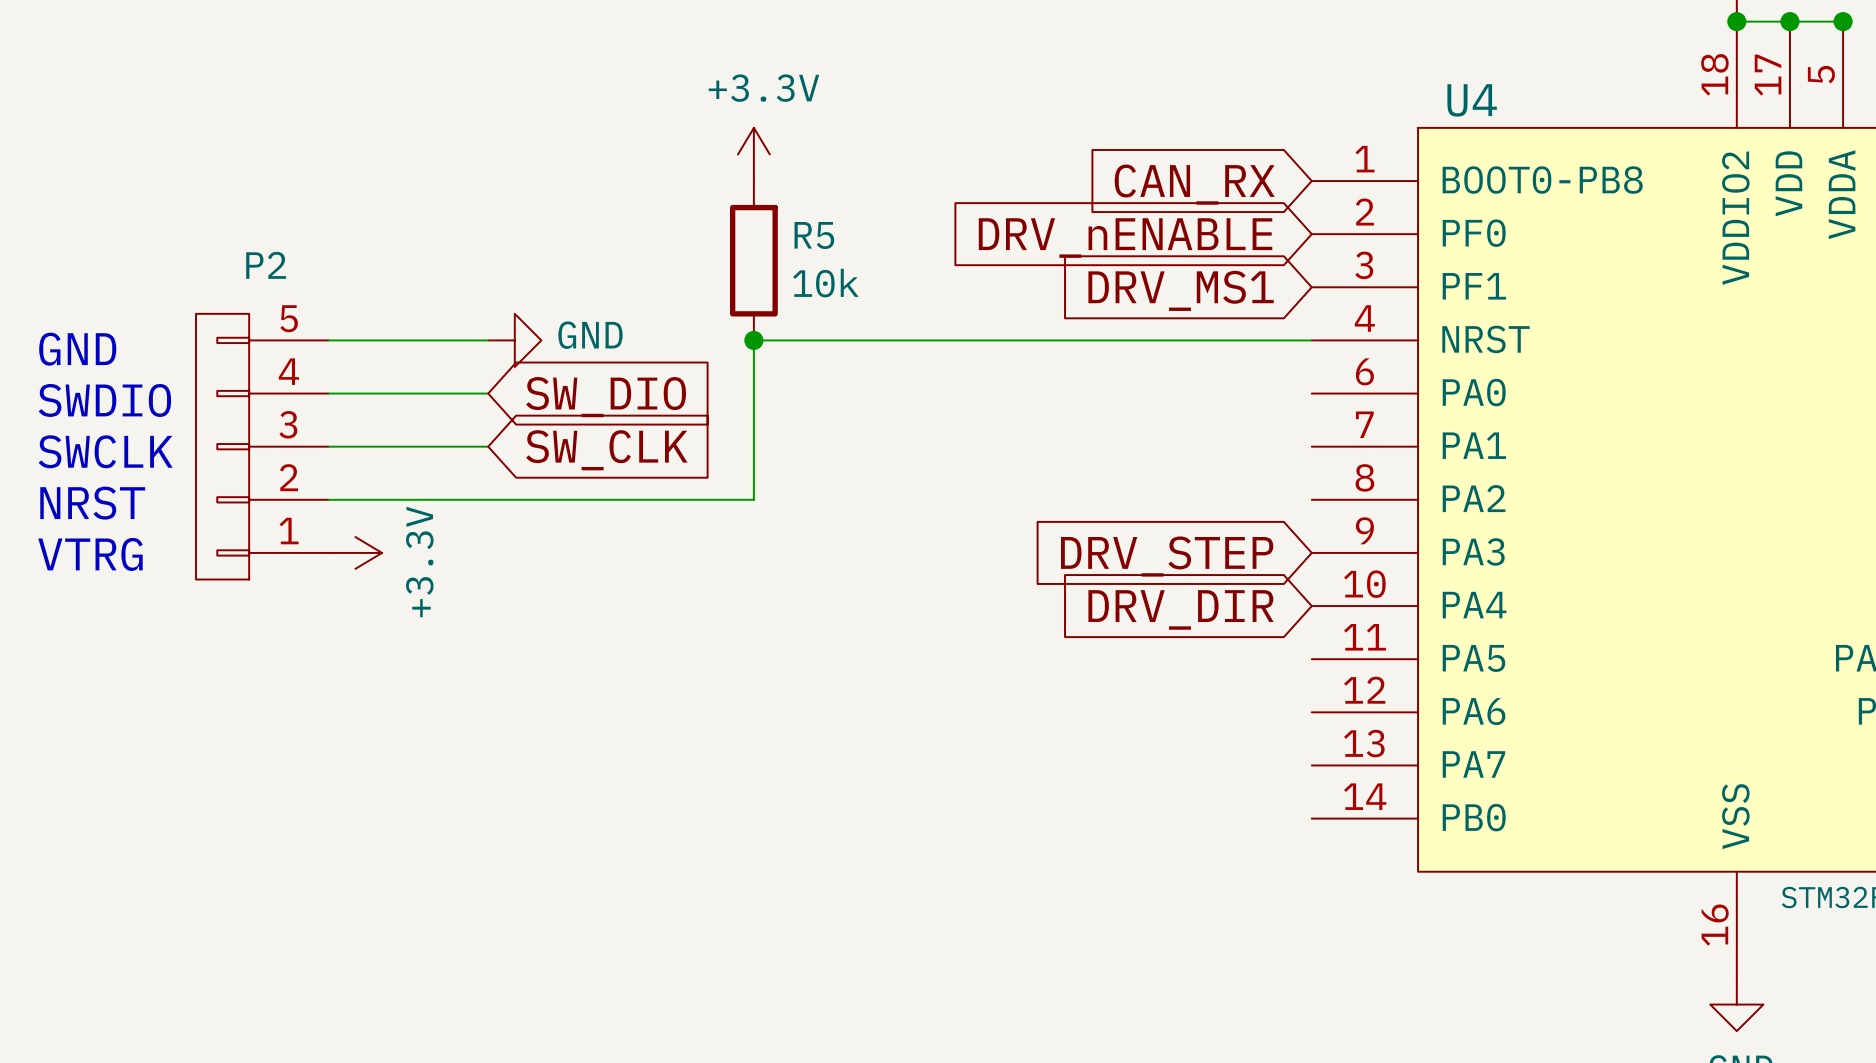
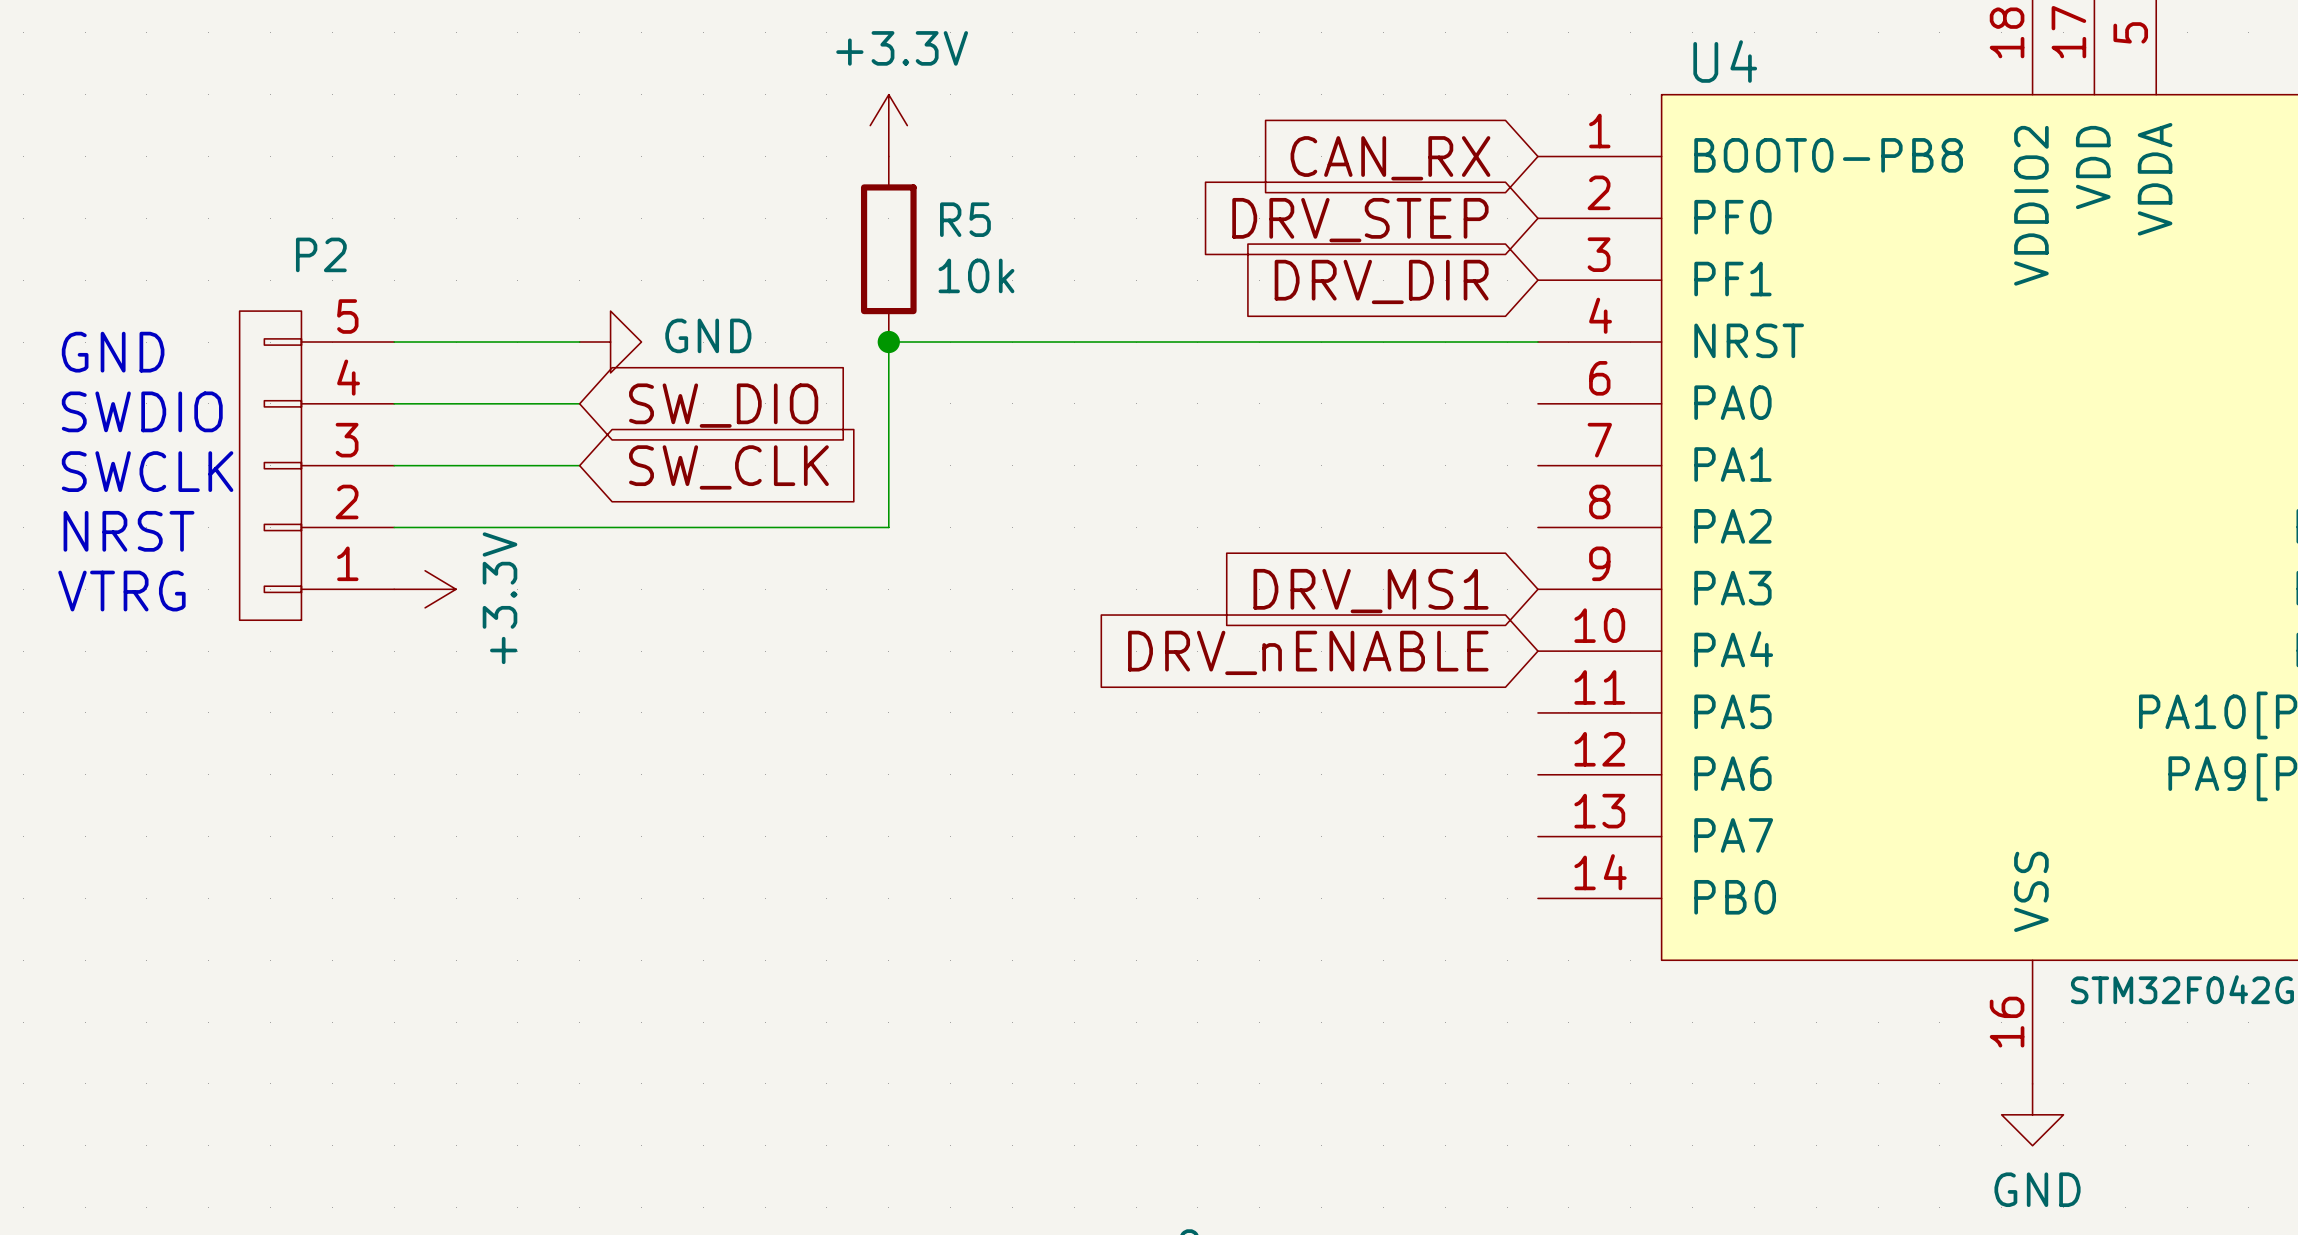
global label: DRV_nENABLE (1125, 238) -> DRV_STEP (1360, 220)
global label: DRV_MS1 (1181, 290) -> DRV_DIR (1381, 281)
global label: DRV_STEP (1167, 556) -> DRV_MS1 (1371, 591)
global label: DRV_DIR (1181, 609) -> DRV_nENABLE (1308, 652)

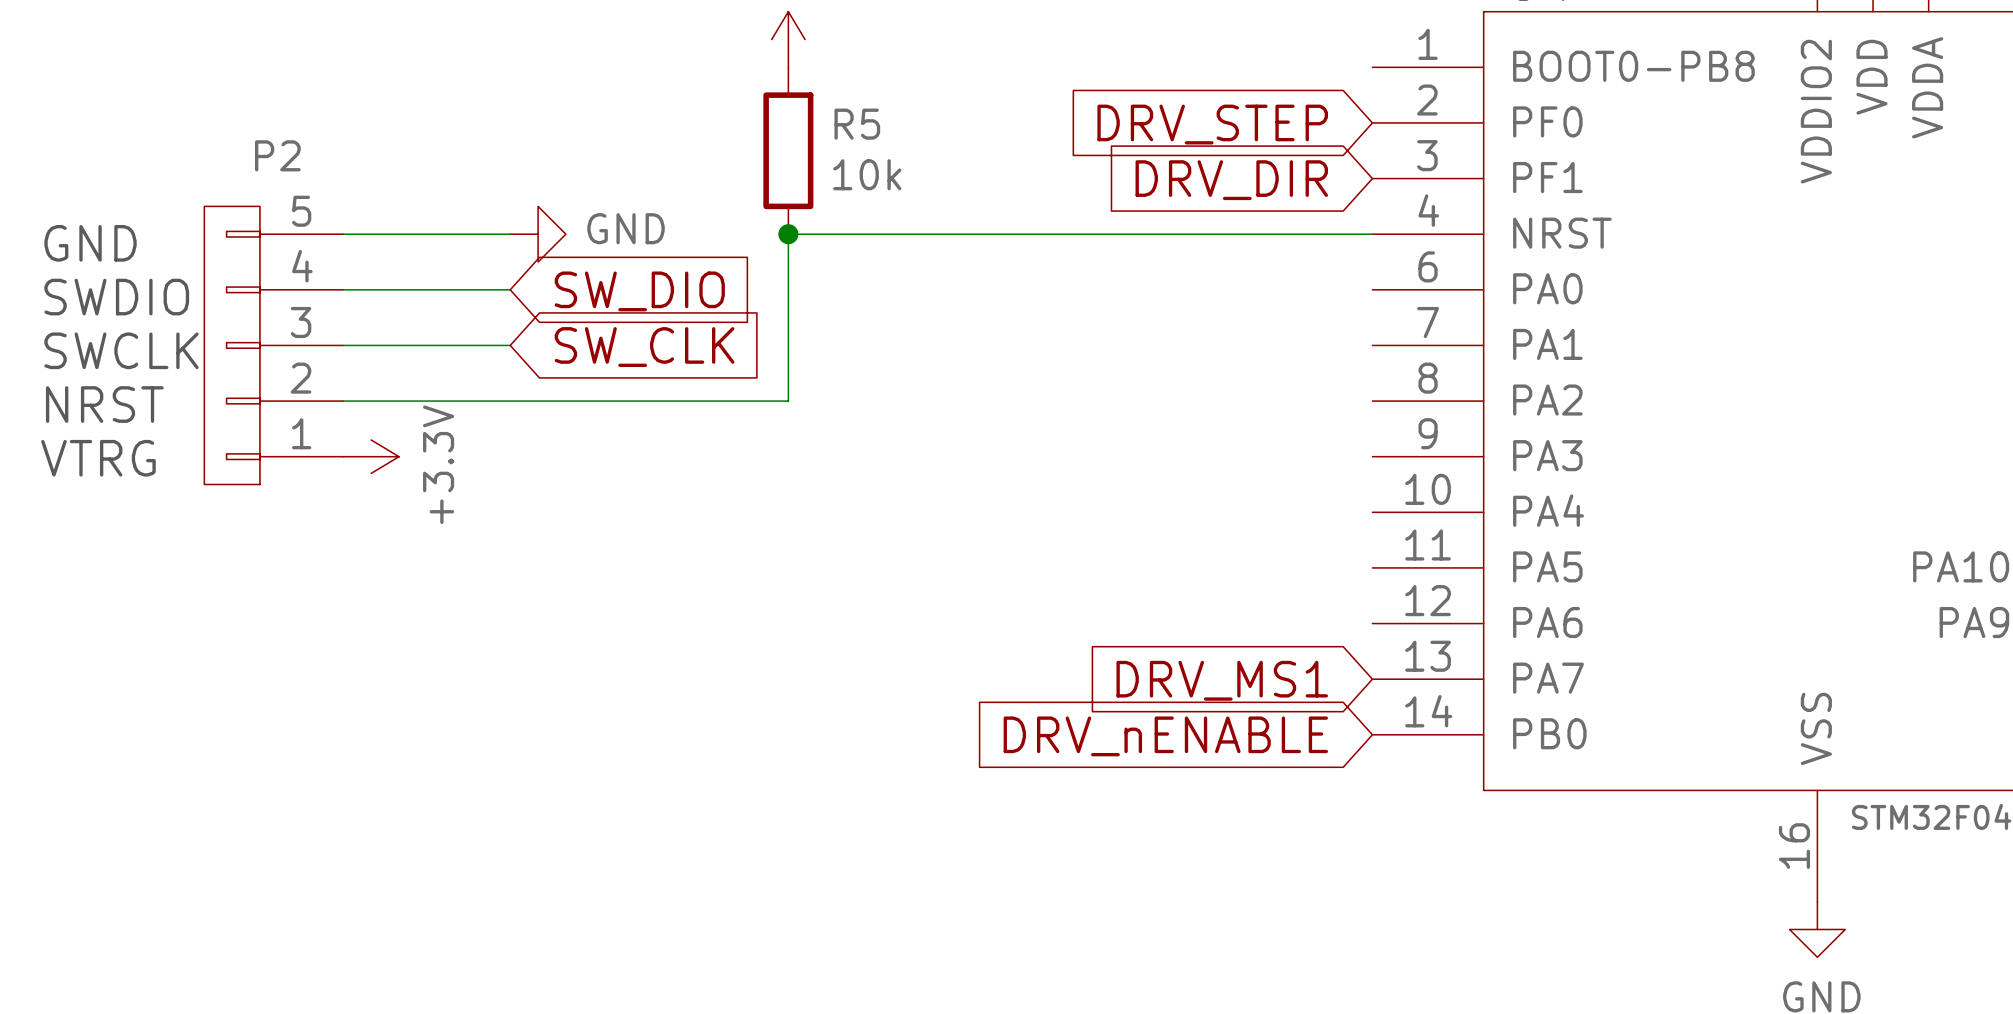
global label: CAN_RX (1390, 158) -> none
global label position: DRV_MS1 (1371, 591) -> DRV_MS1 (1222, 680)
global label position: DRV_nENABLE (1308, 652) -> DRV_nENABLE (1165, 736)

